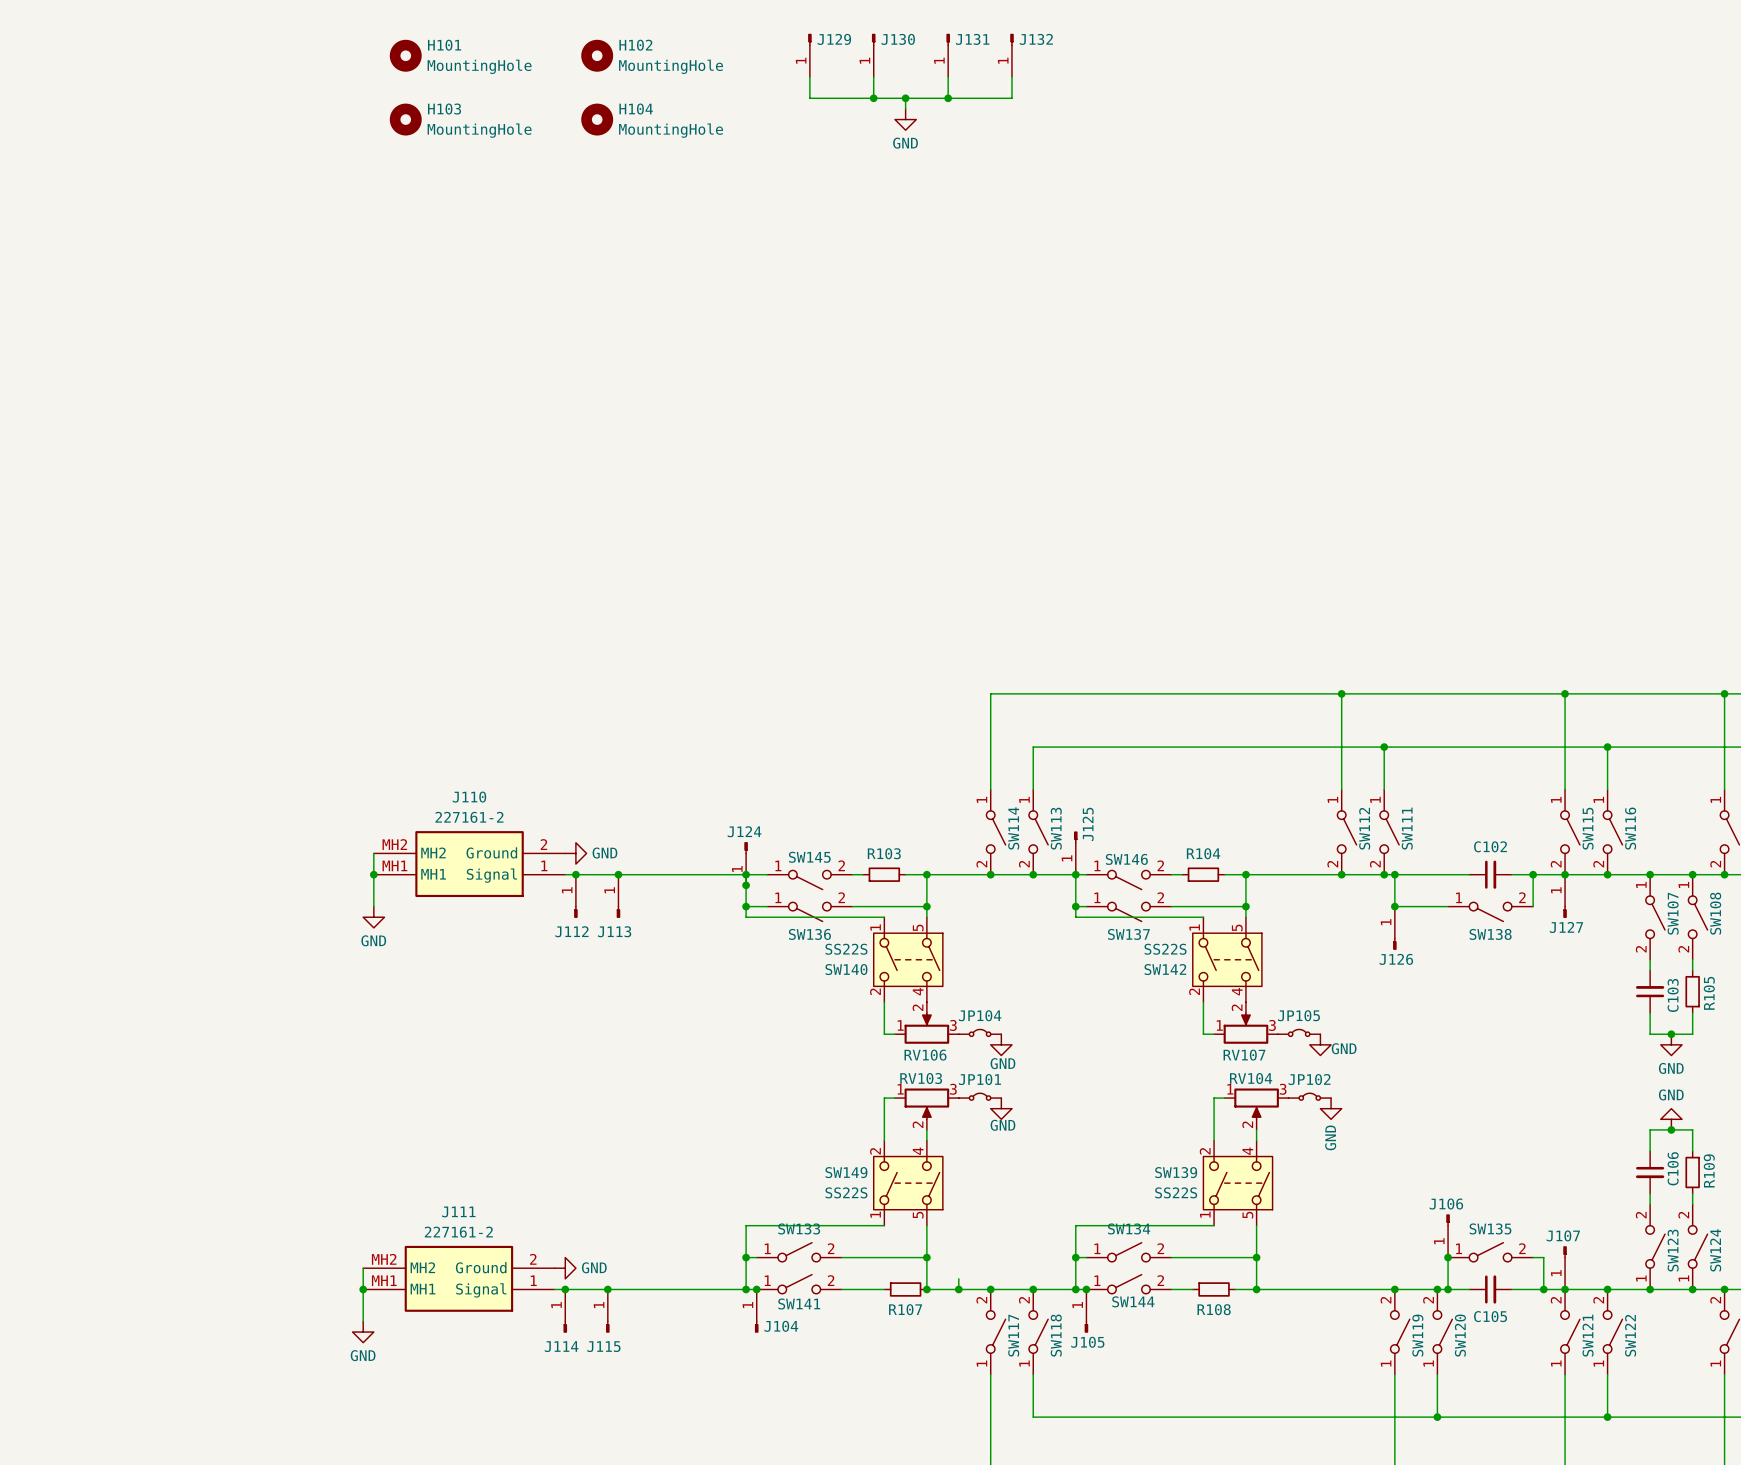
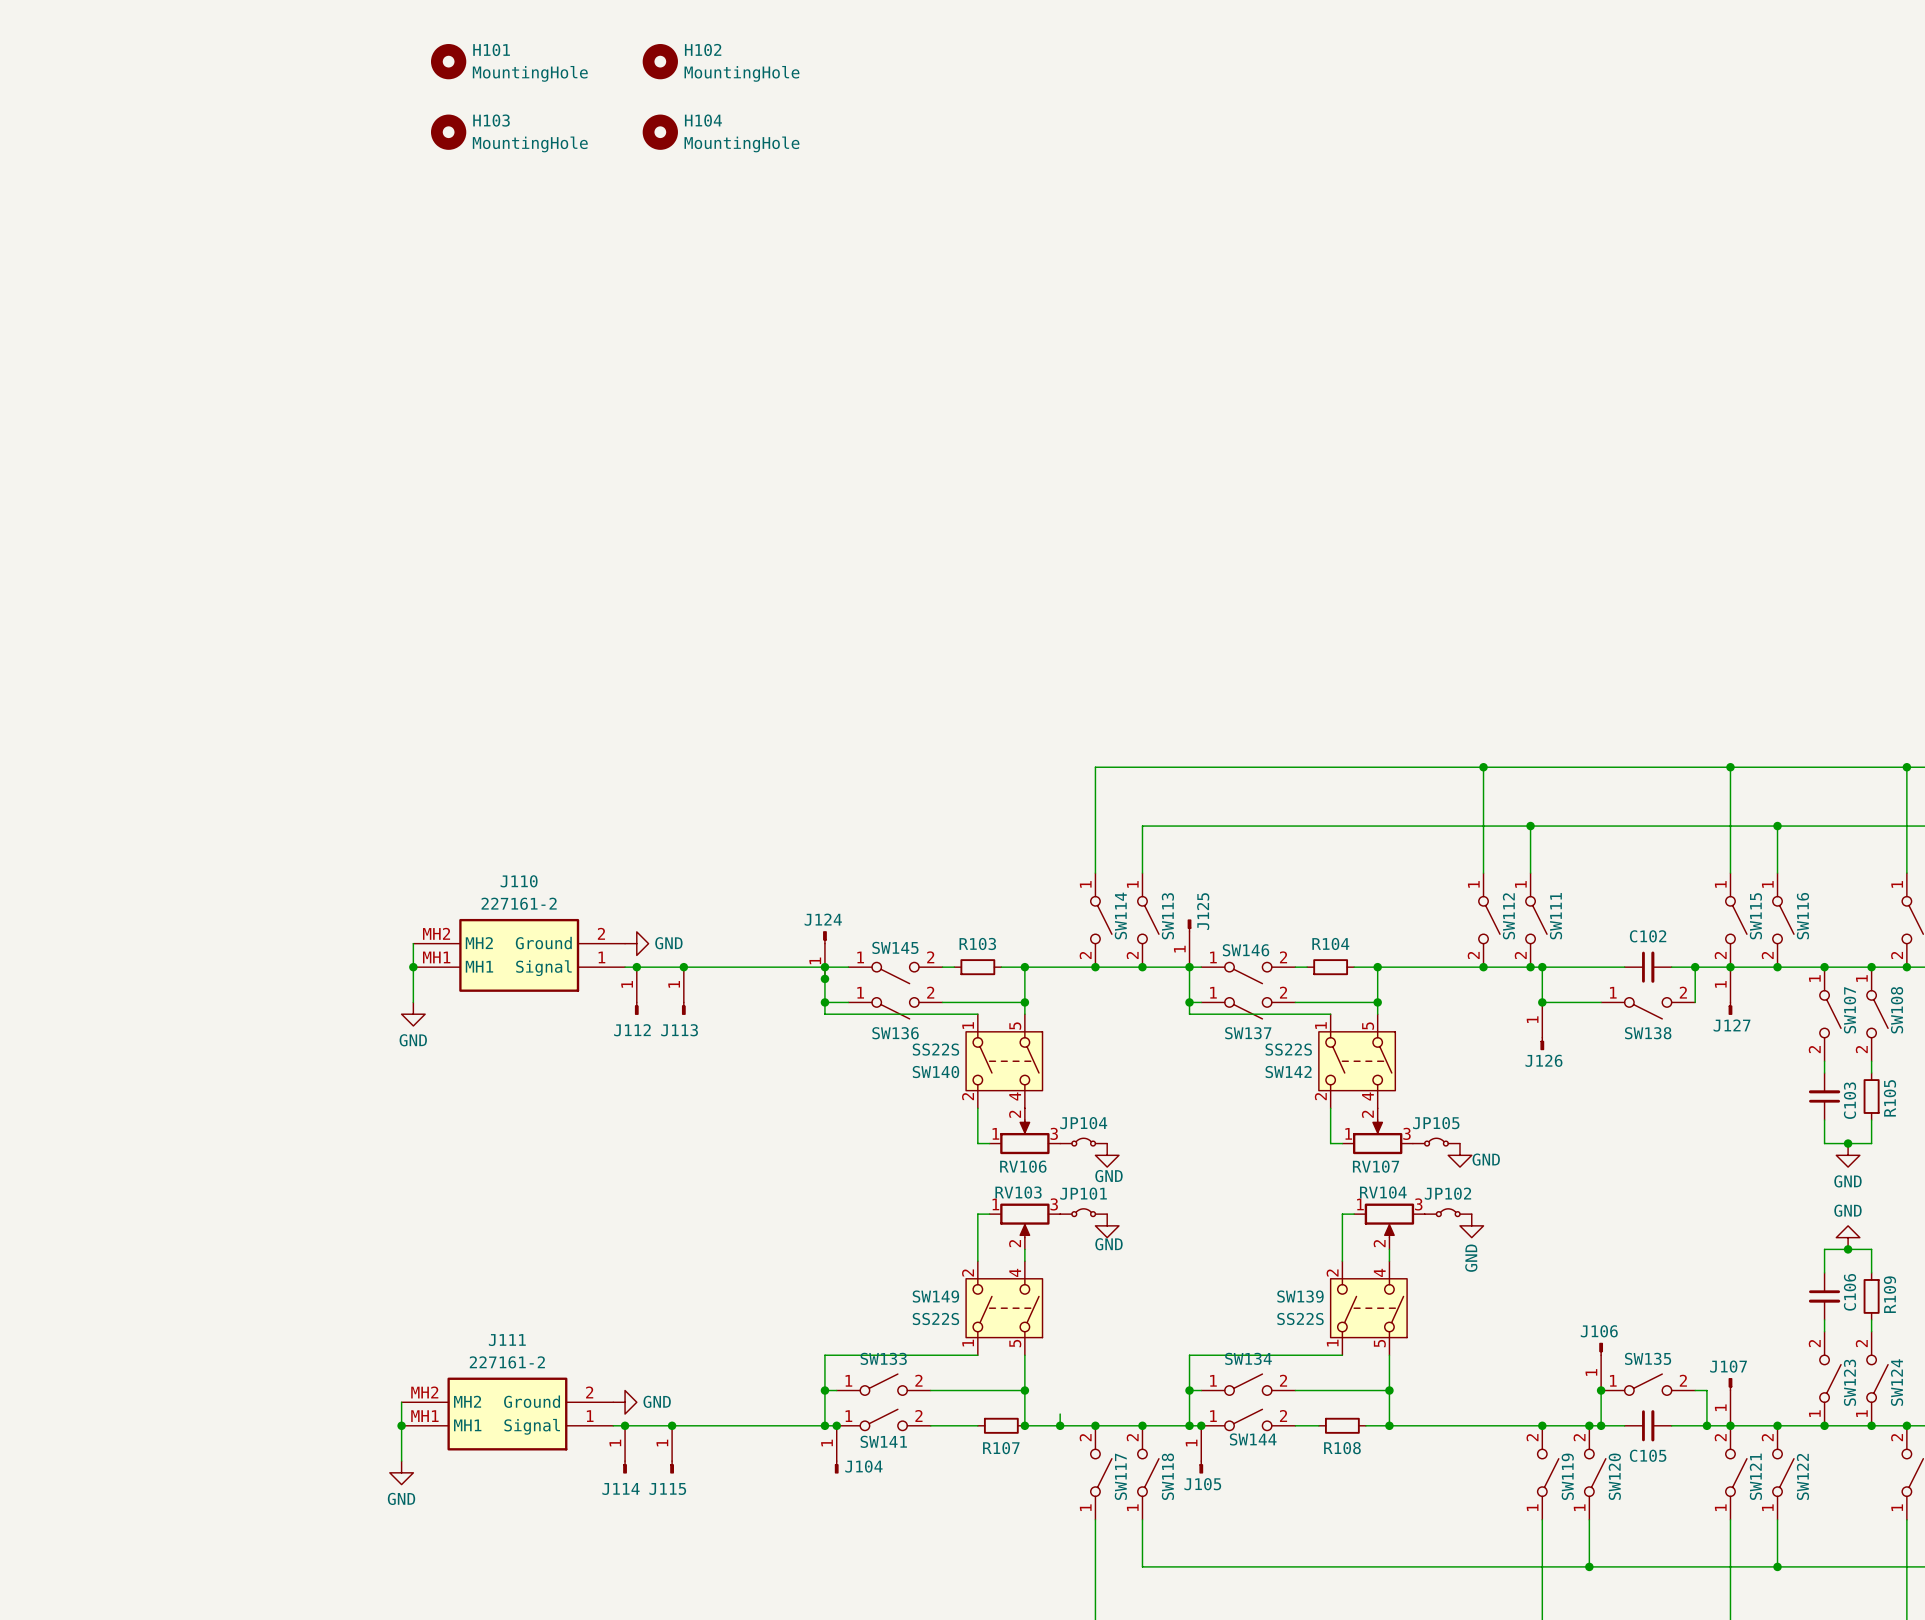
J129: (809, 55) -> none
J130: (873, 55) -> none
J131: (948, 55) -> none
J132: (1011, 55) -> none
wire: (809, 77) (809, 98) (1011, 98) (1011, 77) -> none
wire: (873, 77) (873, 98) -> none
wire: (948, 77) (948, 98) -> none
junction: (873, 98) -> none
wire: (905, 98) (905, 108) -> none
junction: (905, 98) -> none
junction: (948, 98) -> none
power symbol: GND (905, 119) -> none

